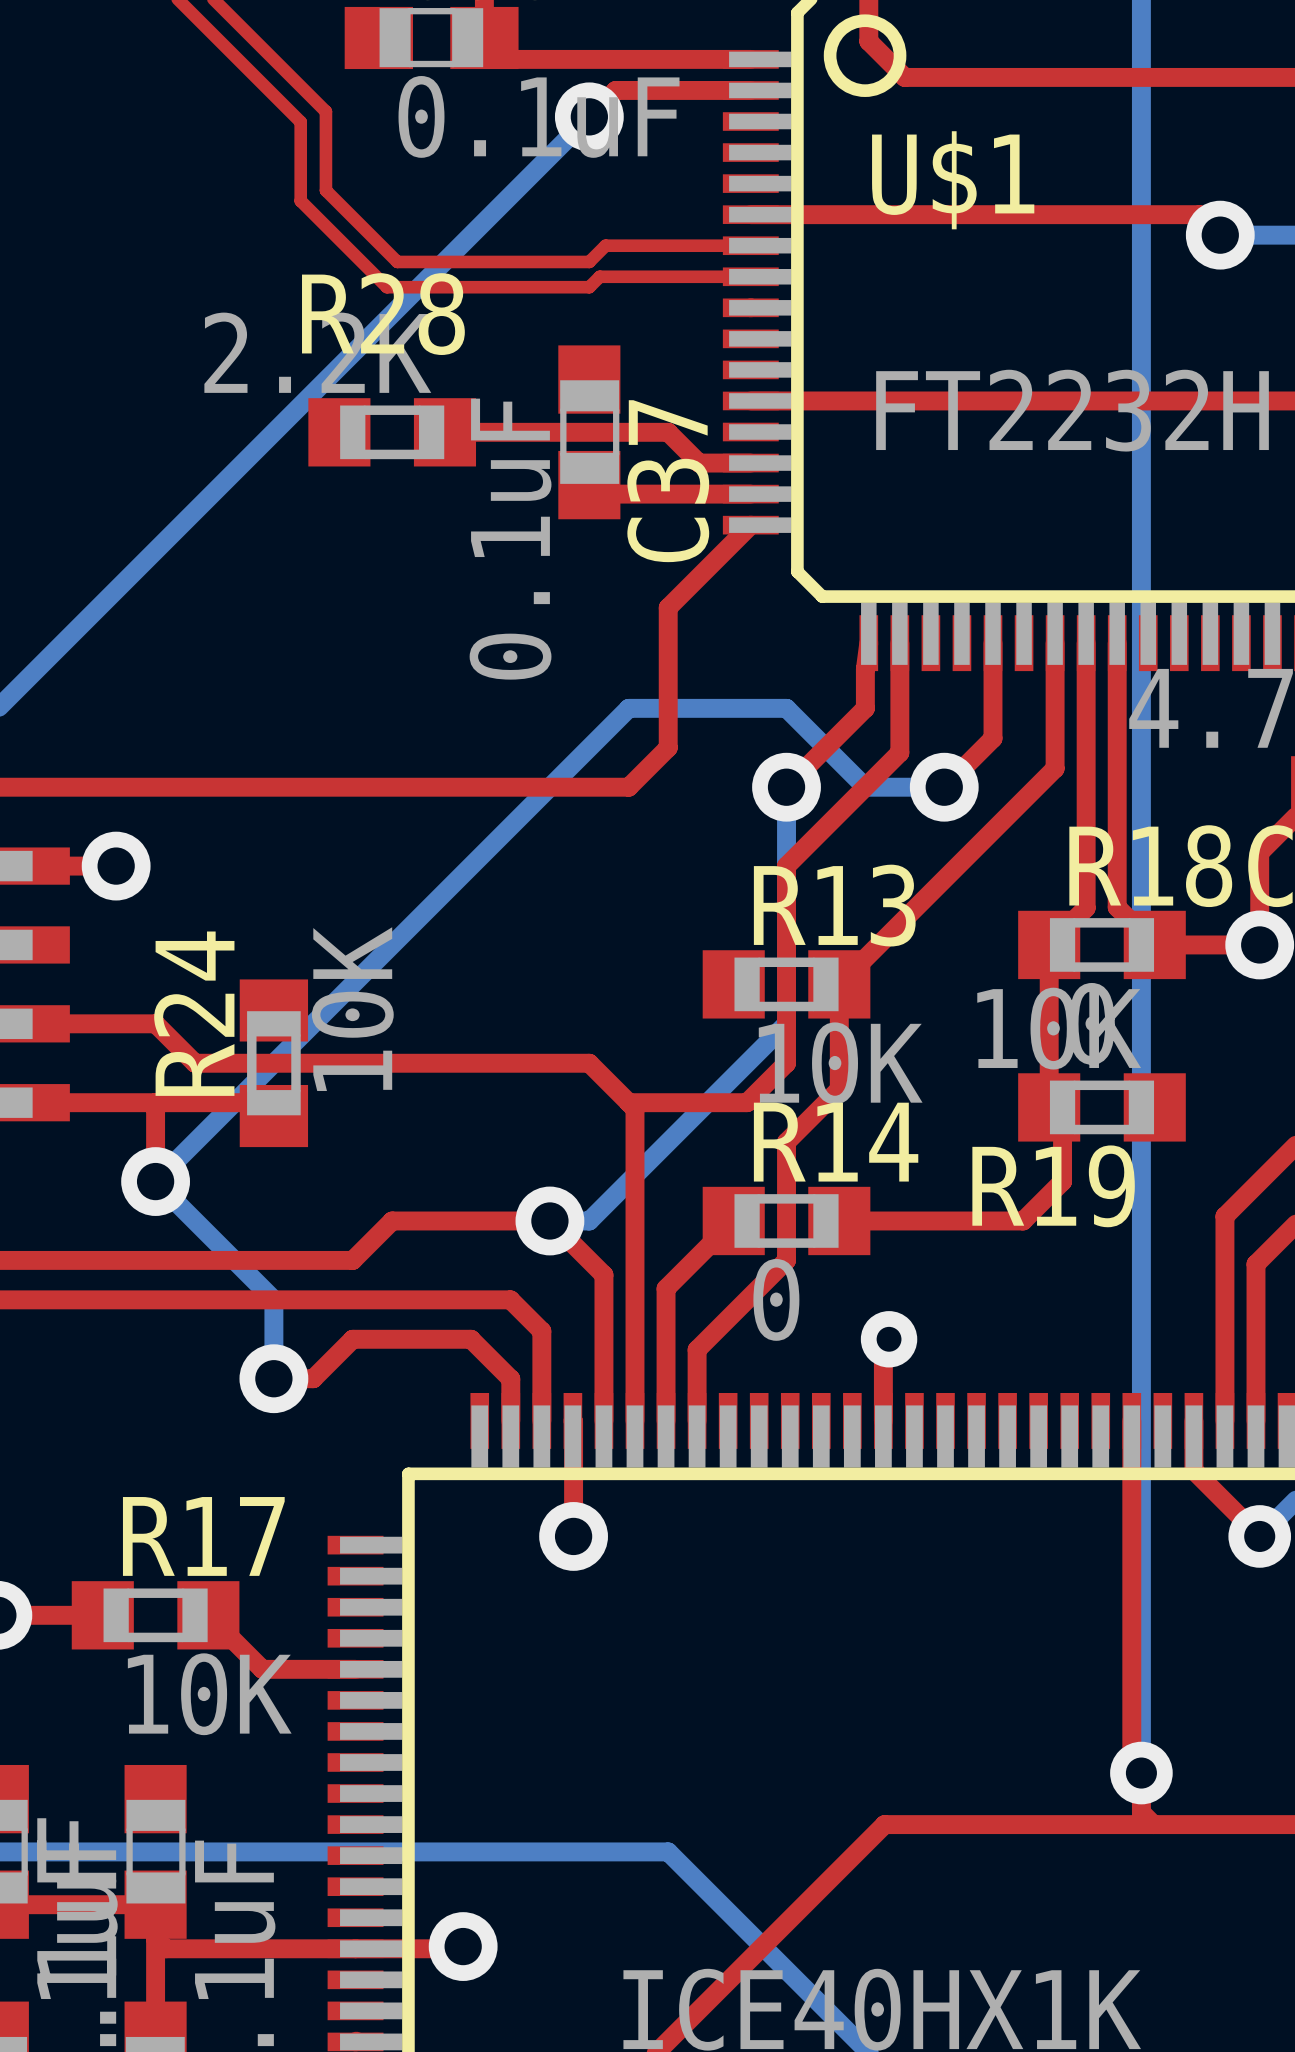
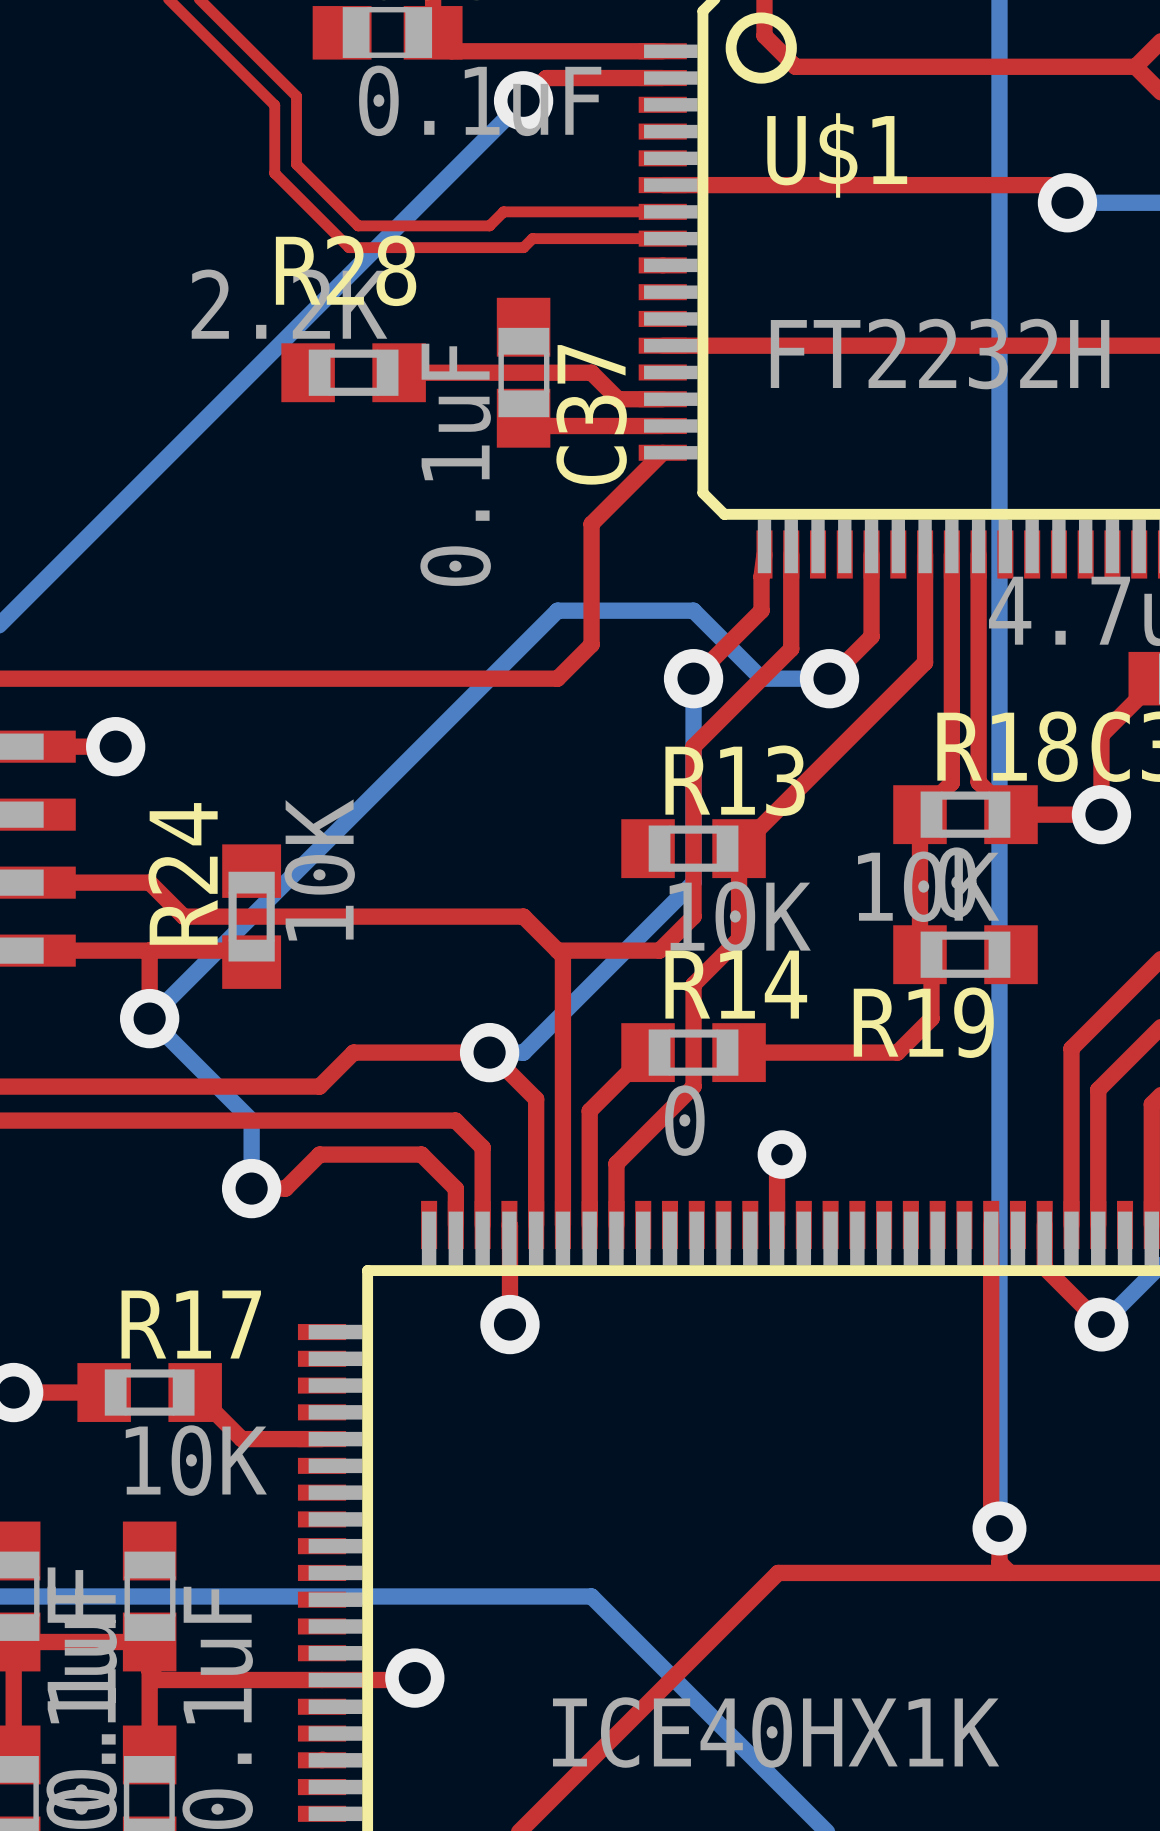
top track: (605, 245) (589, 261) (549, 261) -> (537, 211) (503, 211) (489, 225)

